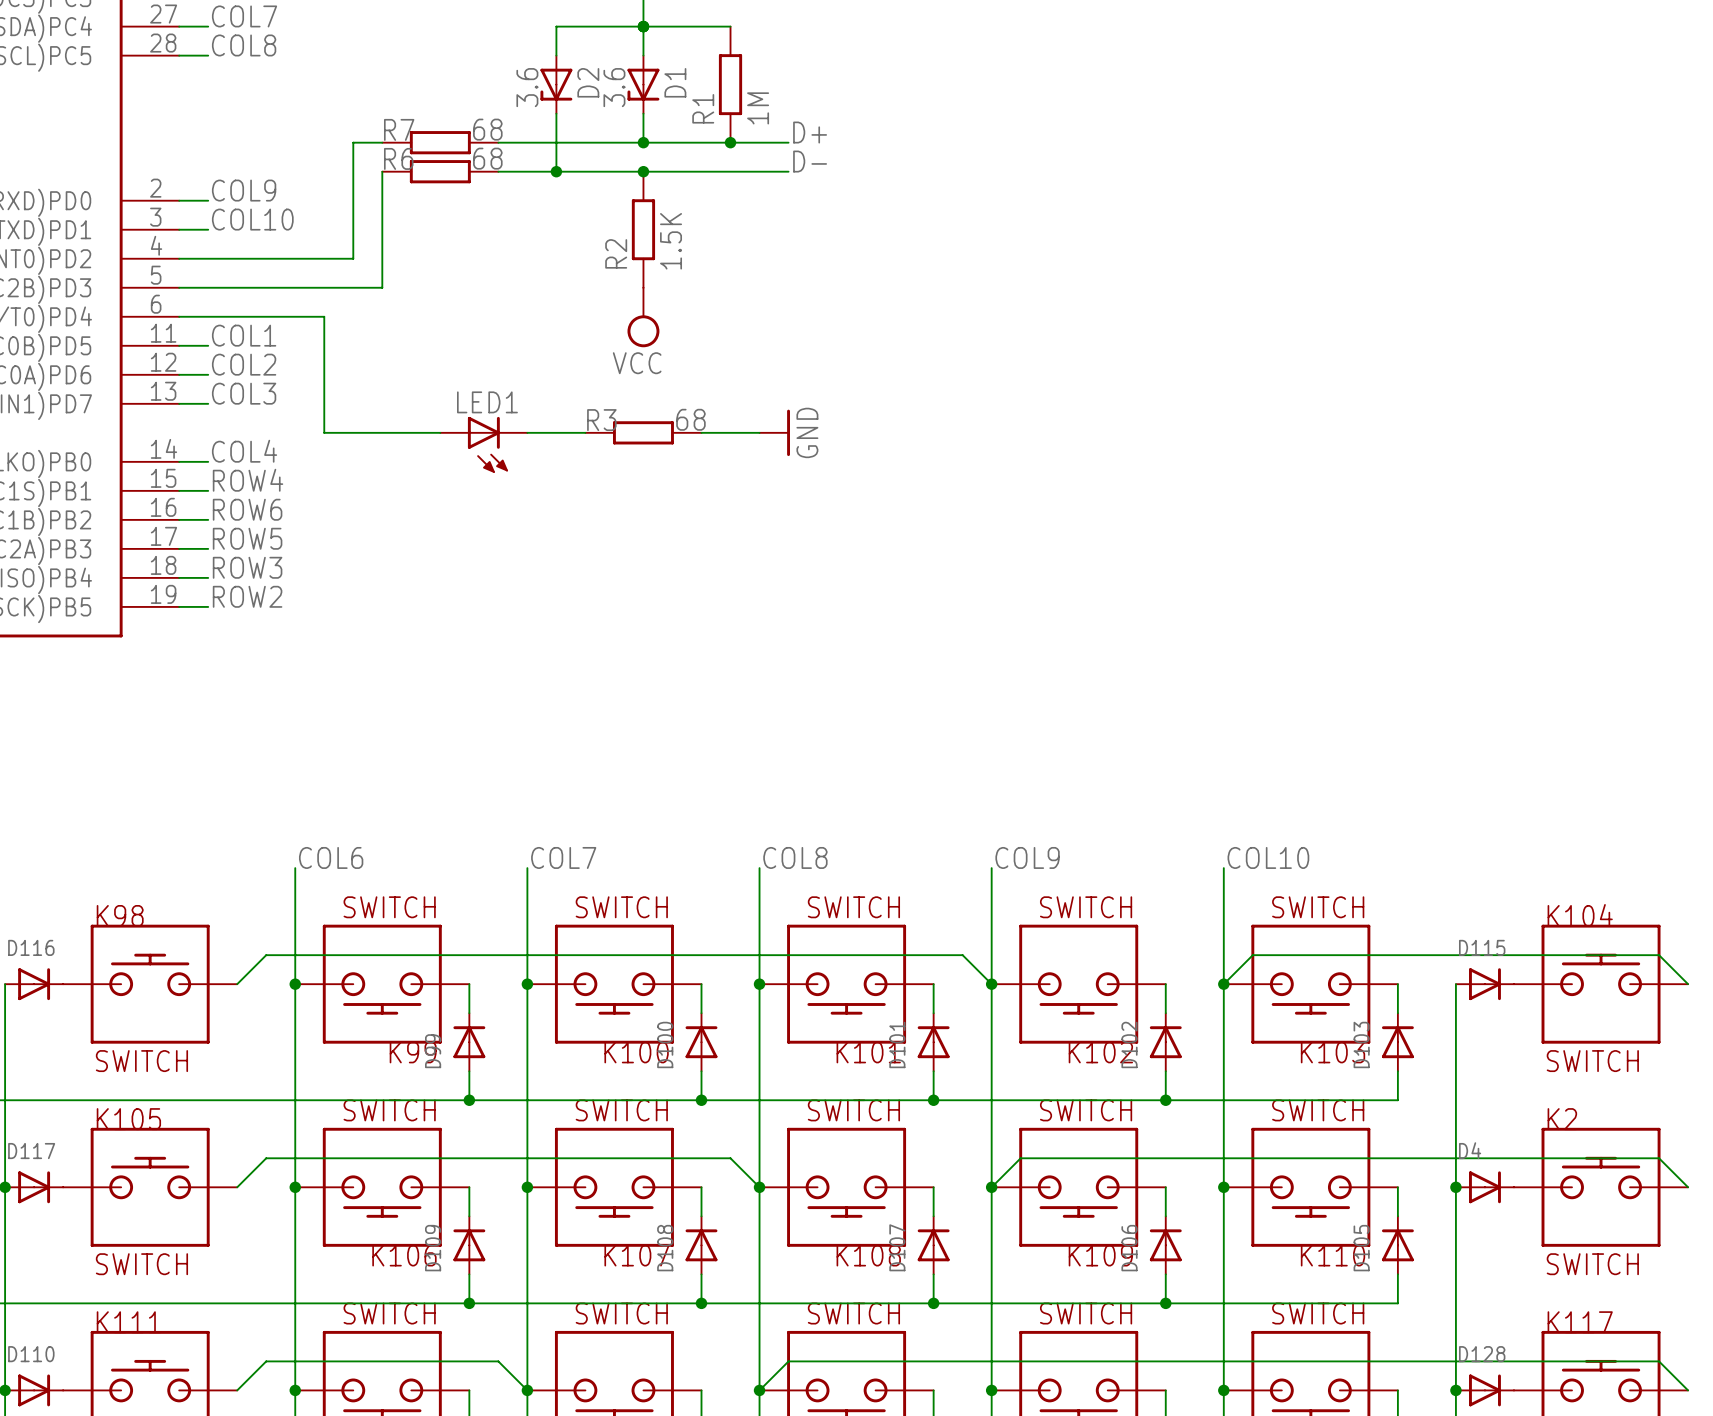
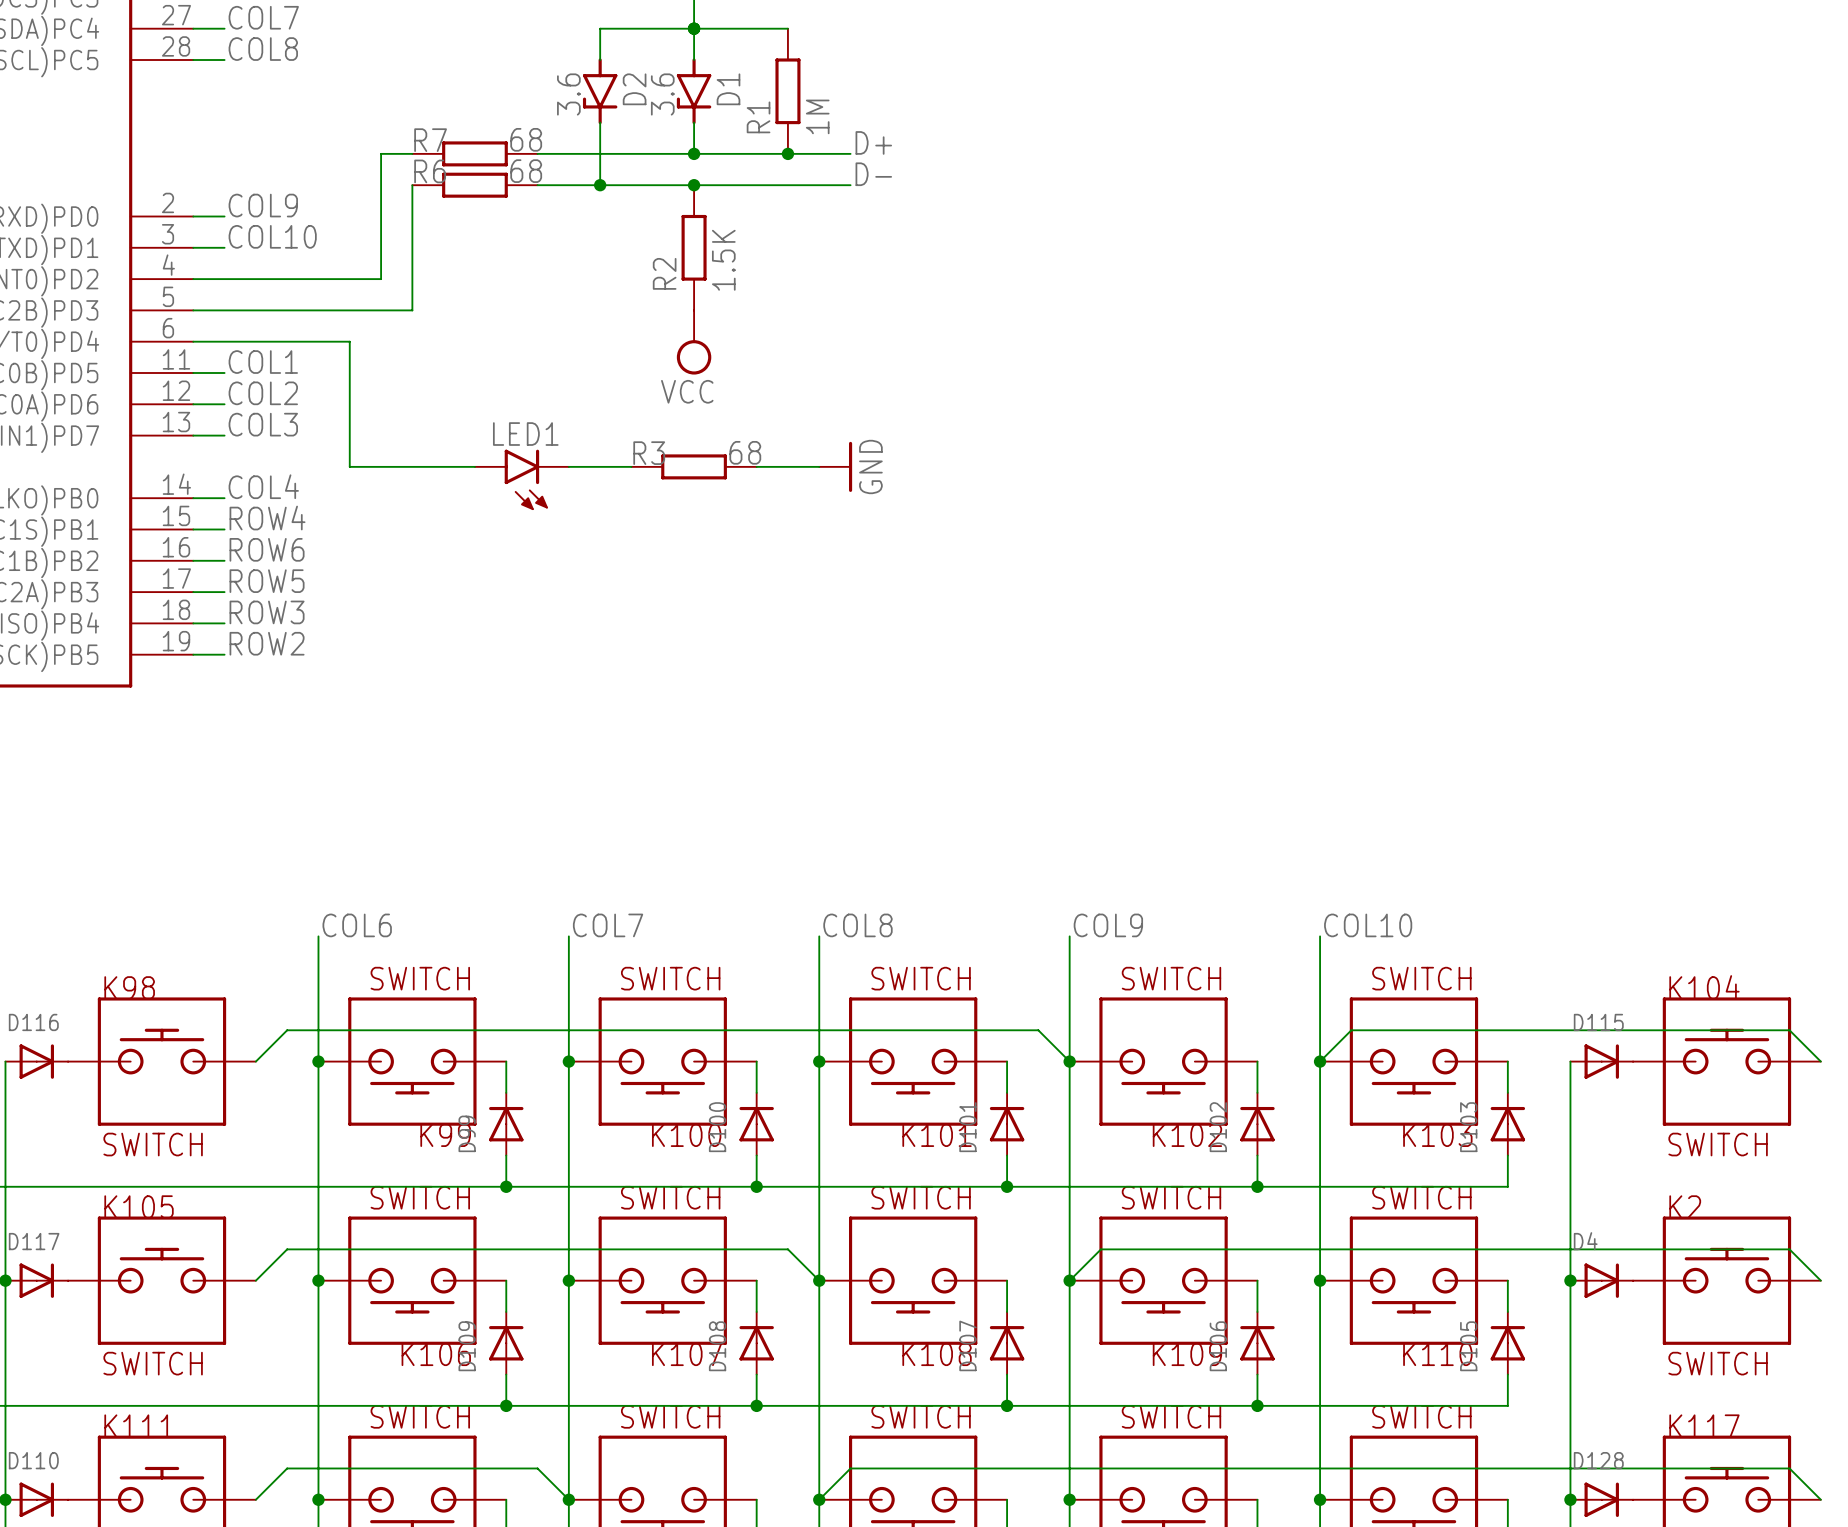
D2 symbol: [540, 55, 573, 114] -> [582, 58, 618, 125]
D1 symbol: [627, 55, 660, 114] -> [676, 58, 712, 125]
LED1 symbol: [440, 416, 528, 473] -> [474, 449, 569, 511]

